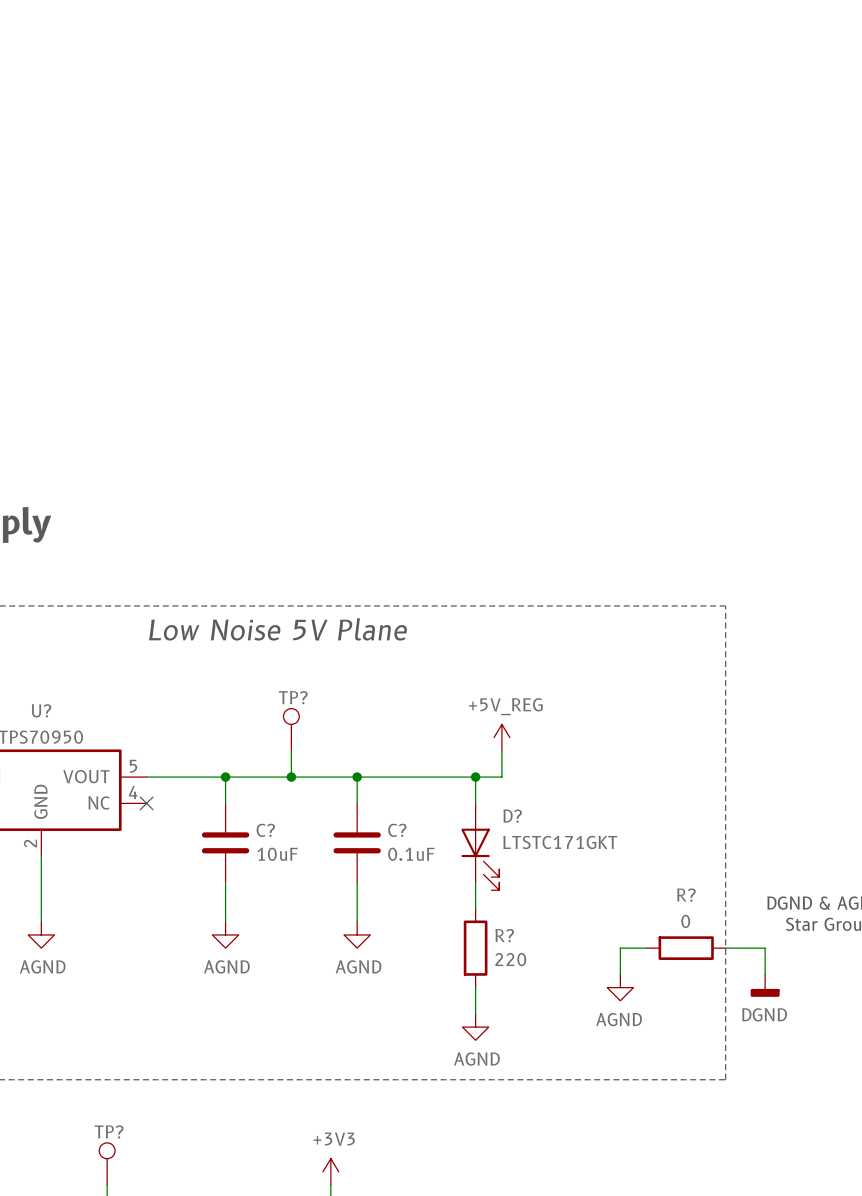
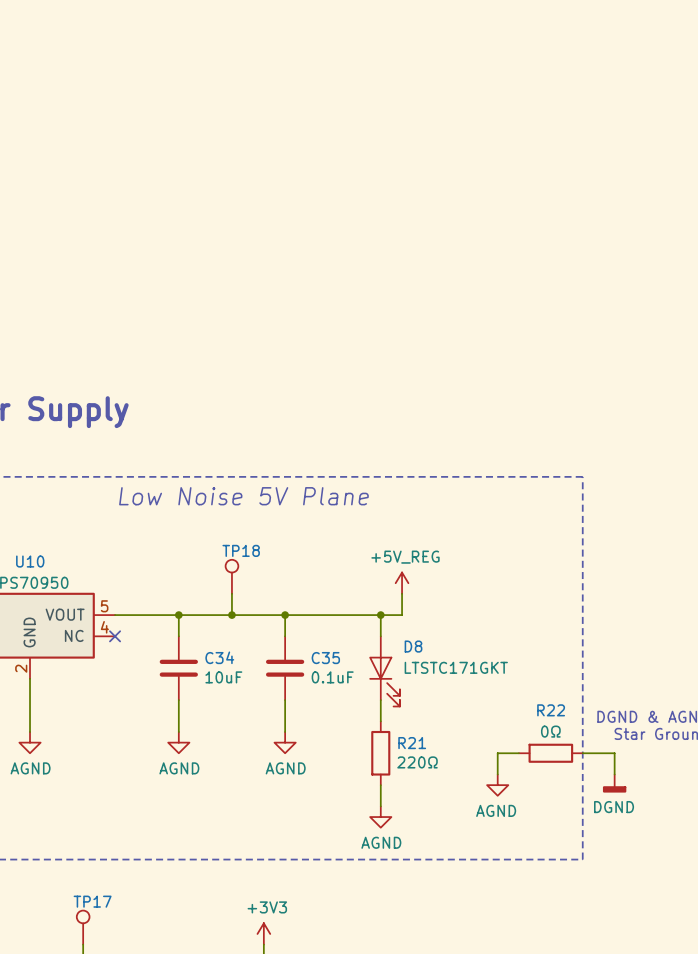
TP? name: TP? (293, 697) -> TP18 (241, 550)
U? name: U? (41, 710) -> U10 (30, 561)
D? name: D? (512, 816) -> D8 (413, 646)
C? name: C? (265, 830) -> C34 (219, 657)
C? name: C? (397, 830) -> C35 (325, 658)
R? name: R? (686, 895) -> R22 (551, 710)
R? value: 0 (685, 921) -> 0Ω (550, 731)
R? name: R? (504, 935) -> R21 (412, 743)
R? value: 220 (510, 959) -> 220Ω (417, 762)
TP? name: TP? (109, 1131) -> TP17 (92, 901)

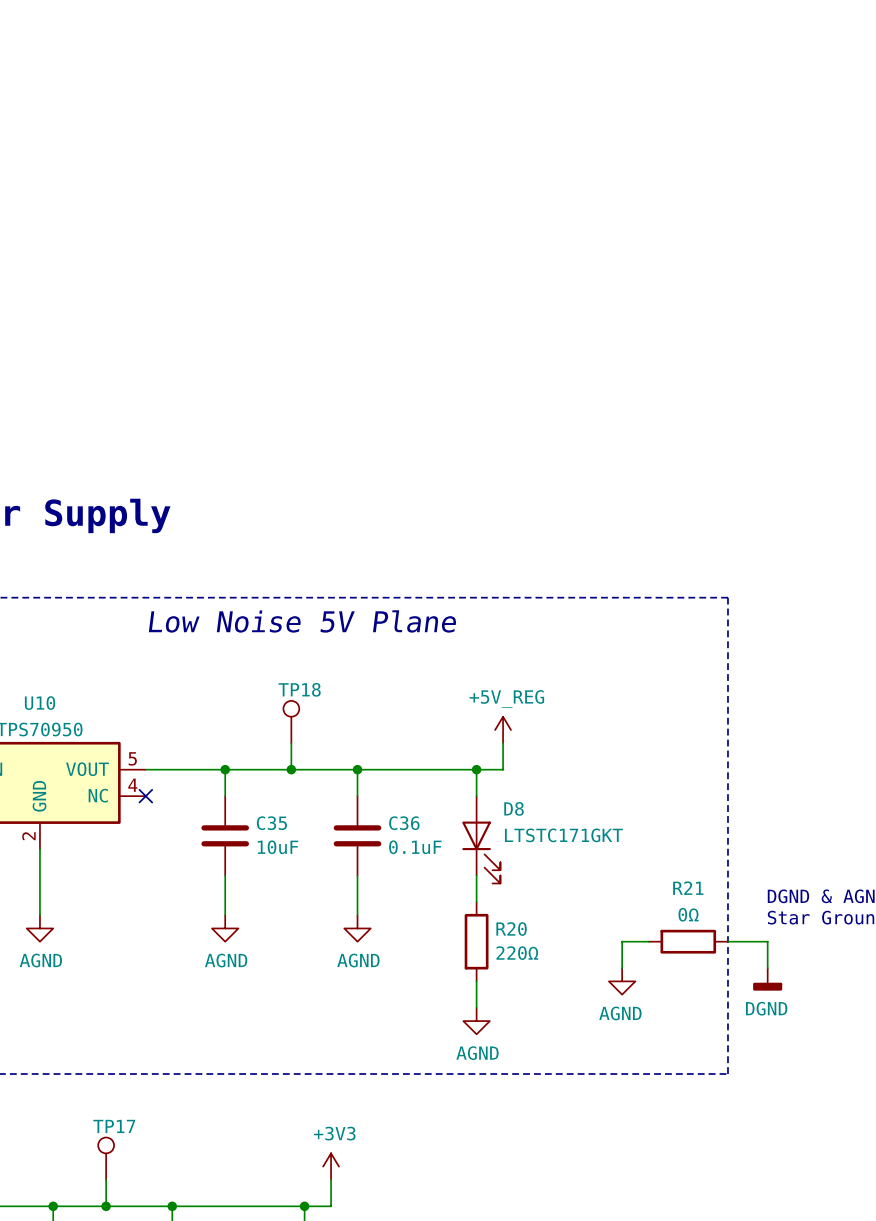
C34 name: C34 (219, 657) -> C35 (271, 823)
C35 name: C35 (325, 658) -> C36 (404, 823)
R22 name: R22 (551, 710) -> R21 (688, 888)
R21 name: R21 (412, 743) -> R20 (511, 929)

